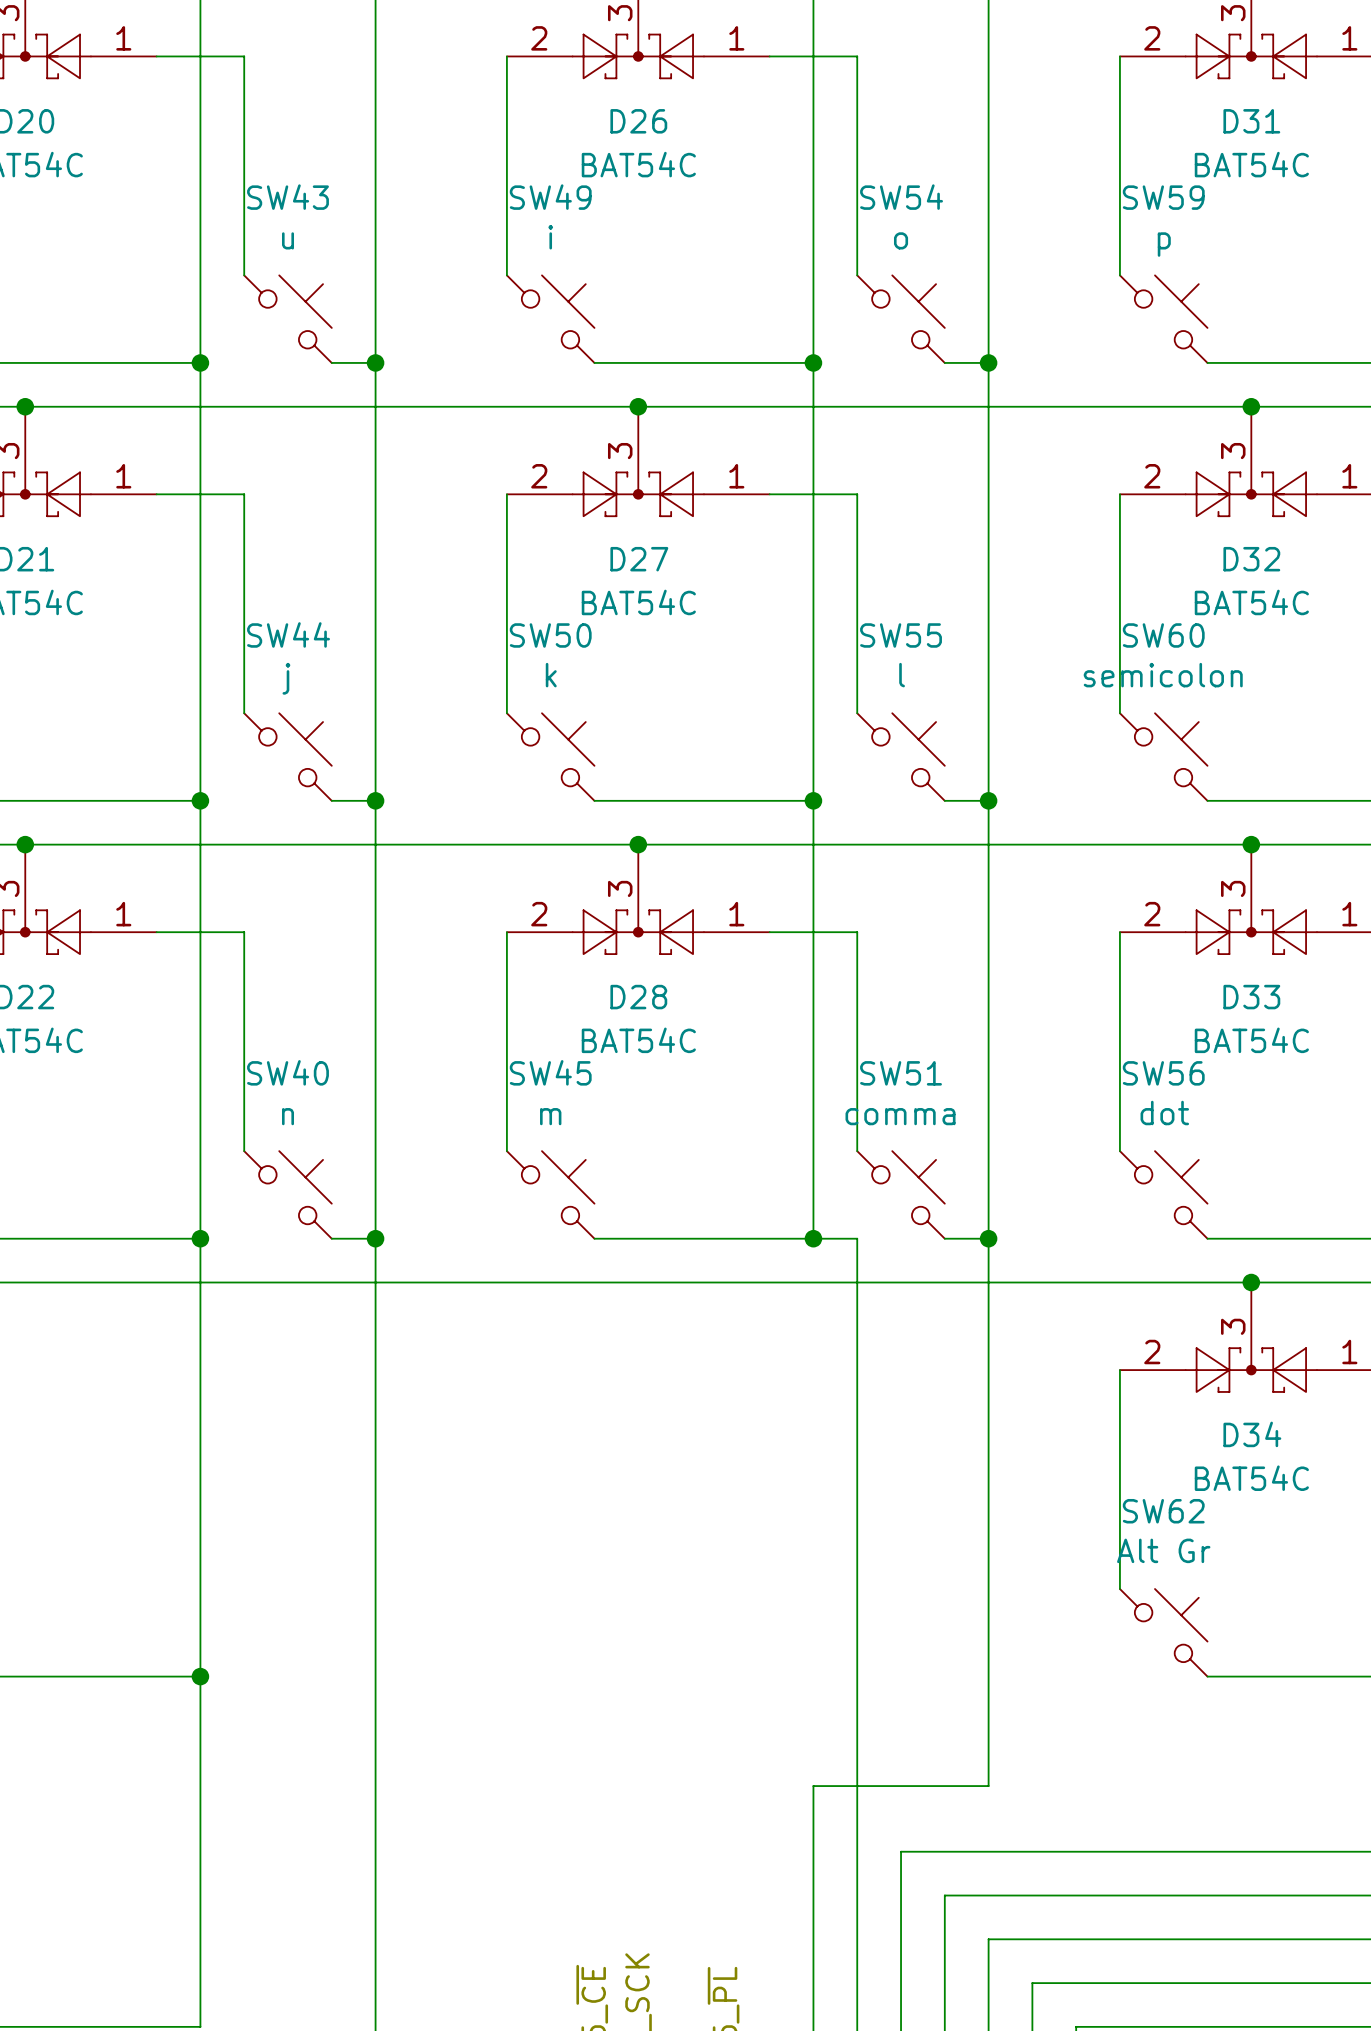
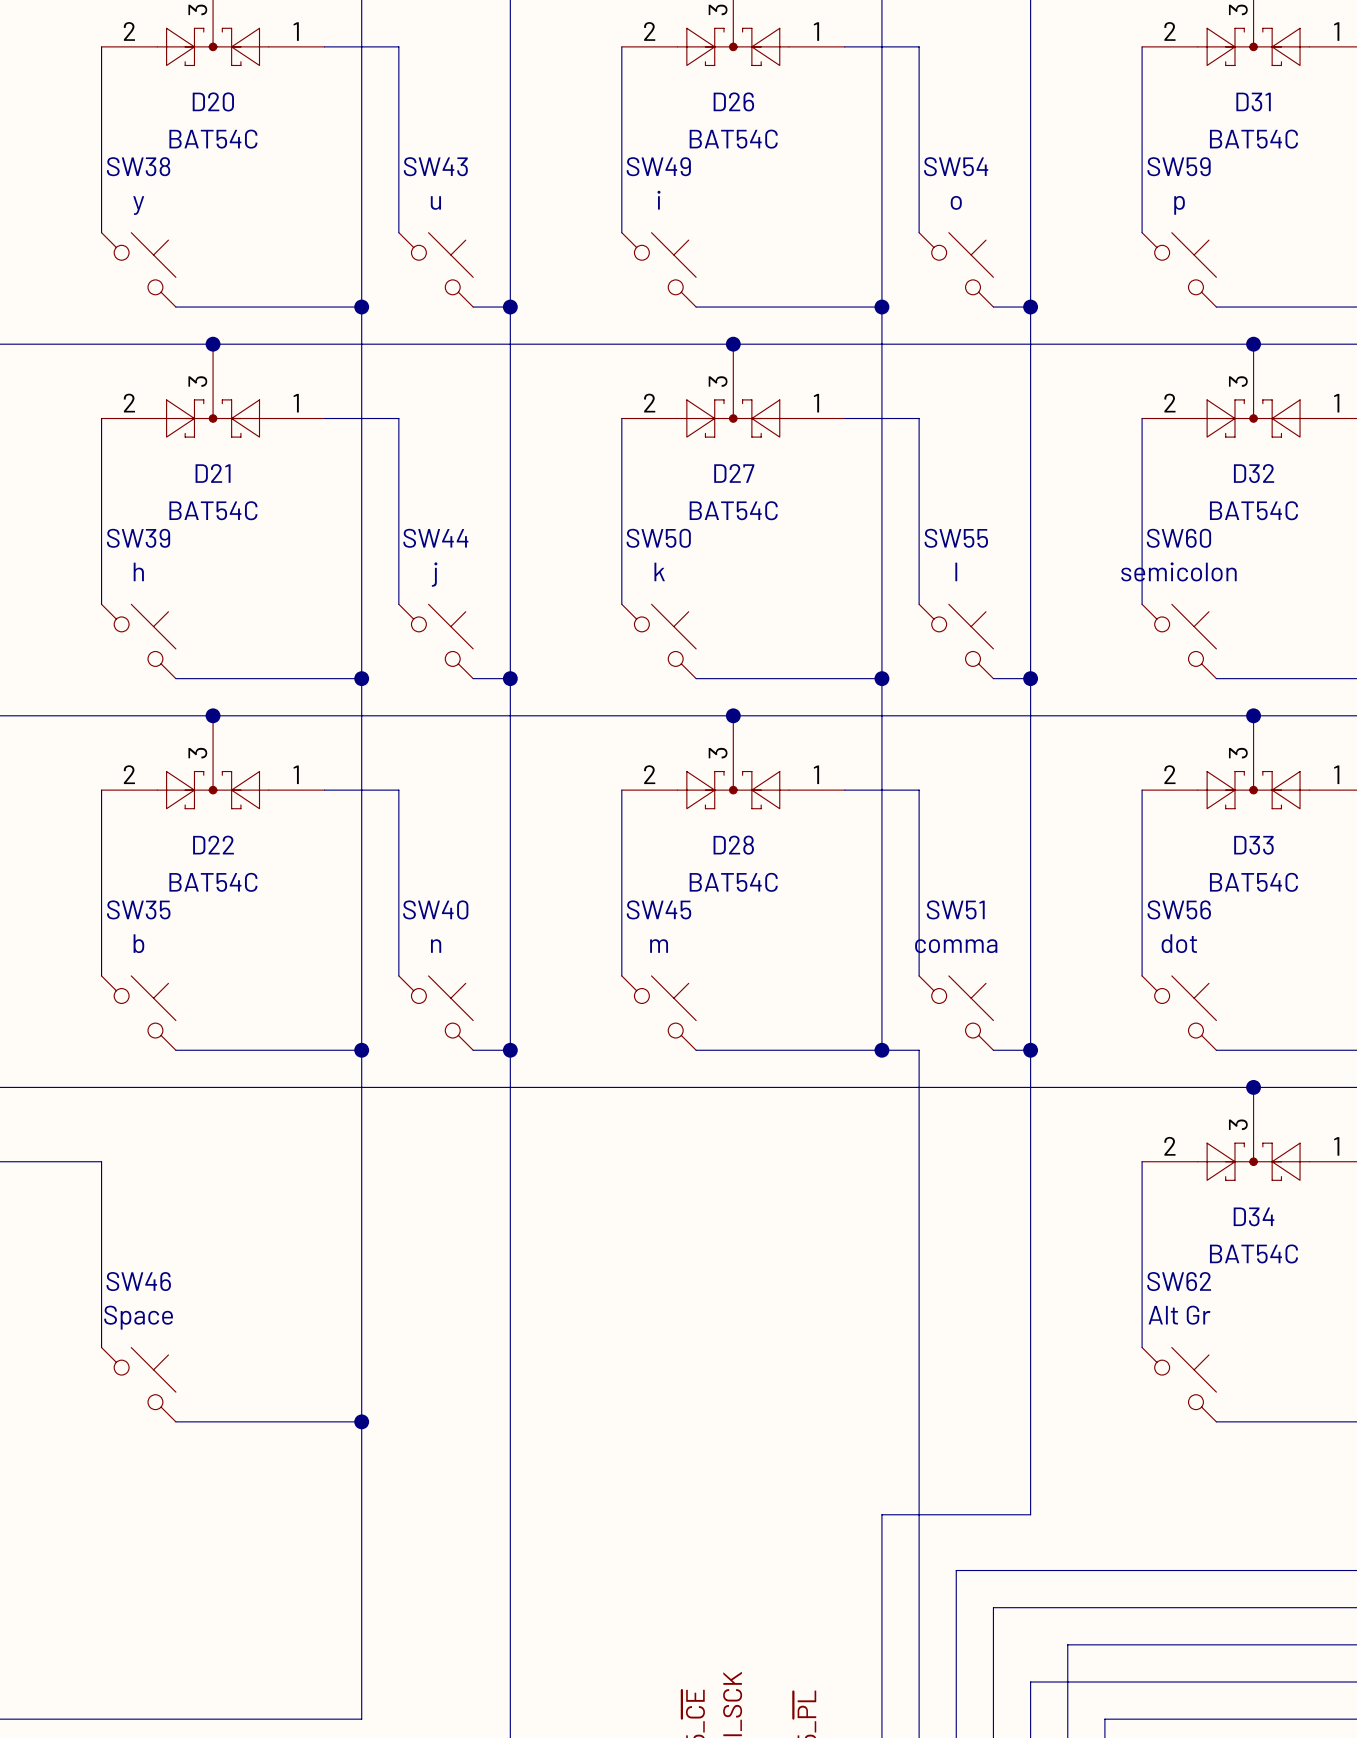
wire: (1032, 1939) (988, 1939) (988, 1983) -> (1067, 1644) (1067, 1682) (1030, 1682)

